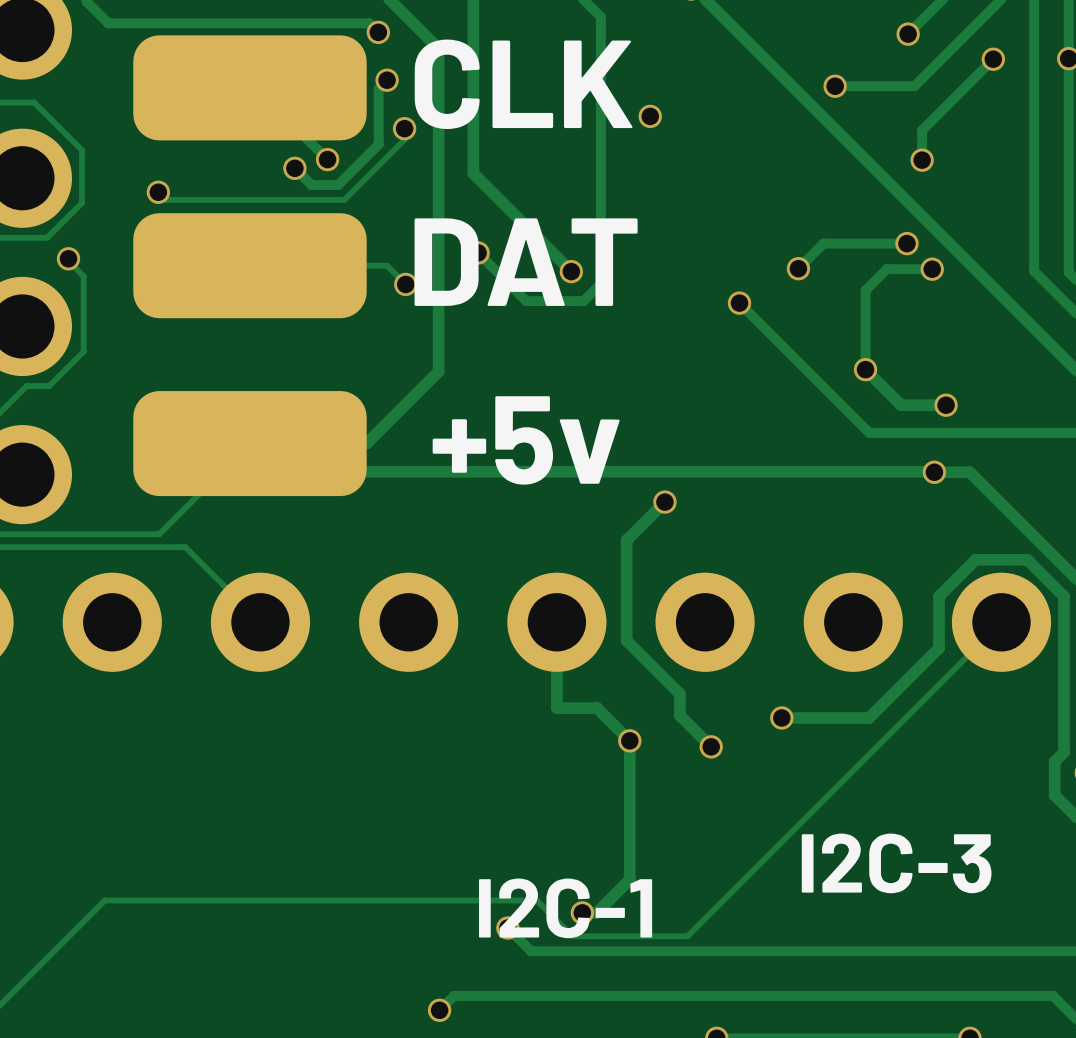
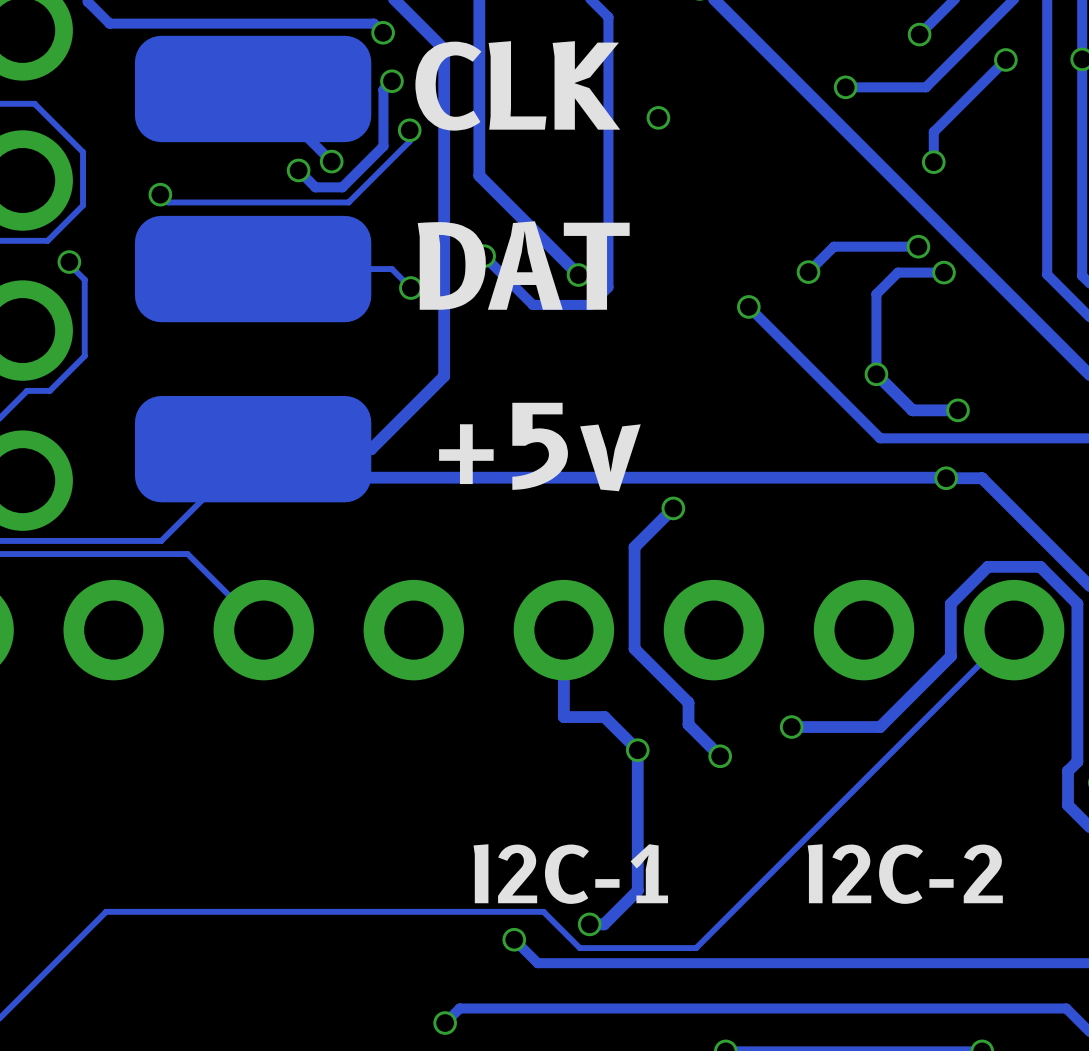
I2C-3 name: I2C-3 (896, 863) -> I2C-2 (905, 874)
I2C-1 position: (565, 908) -> (570, 874)

